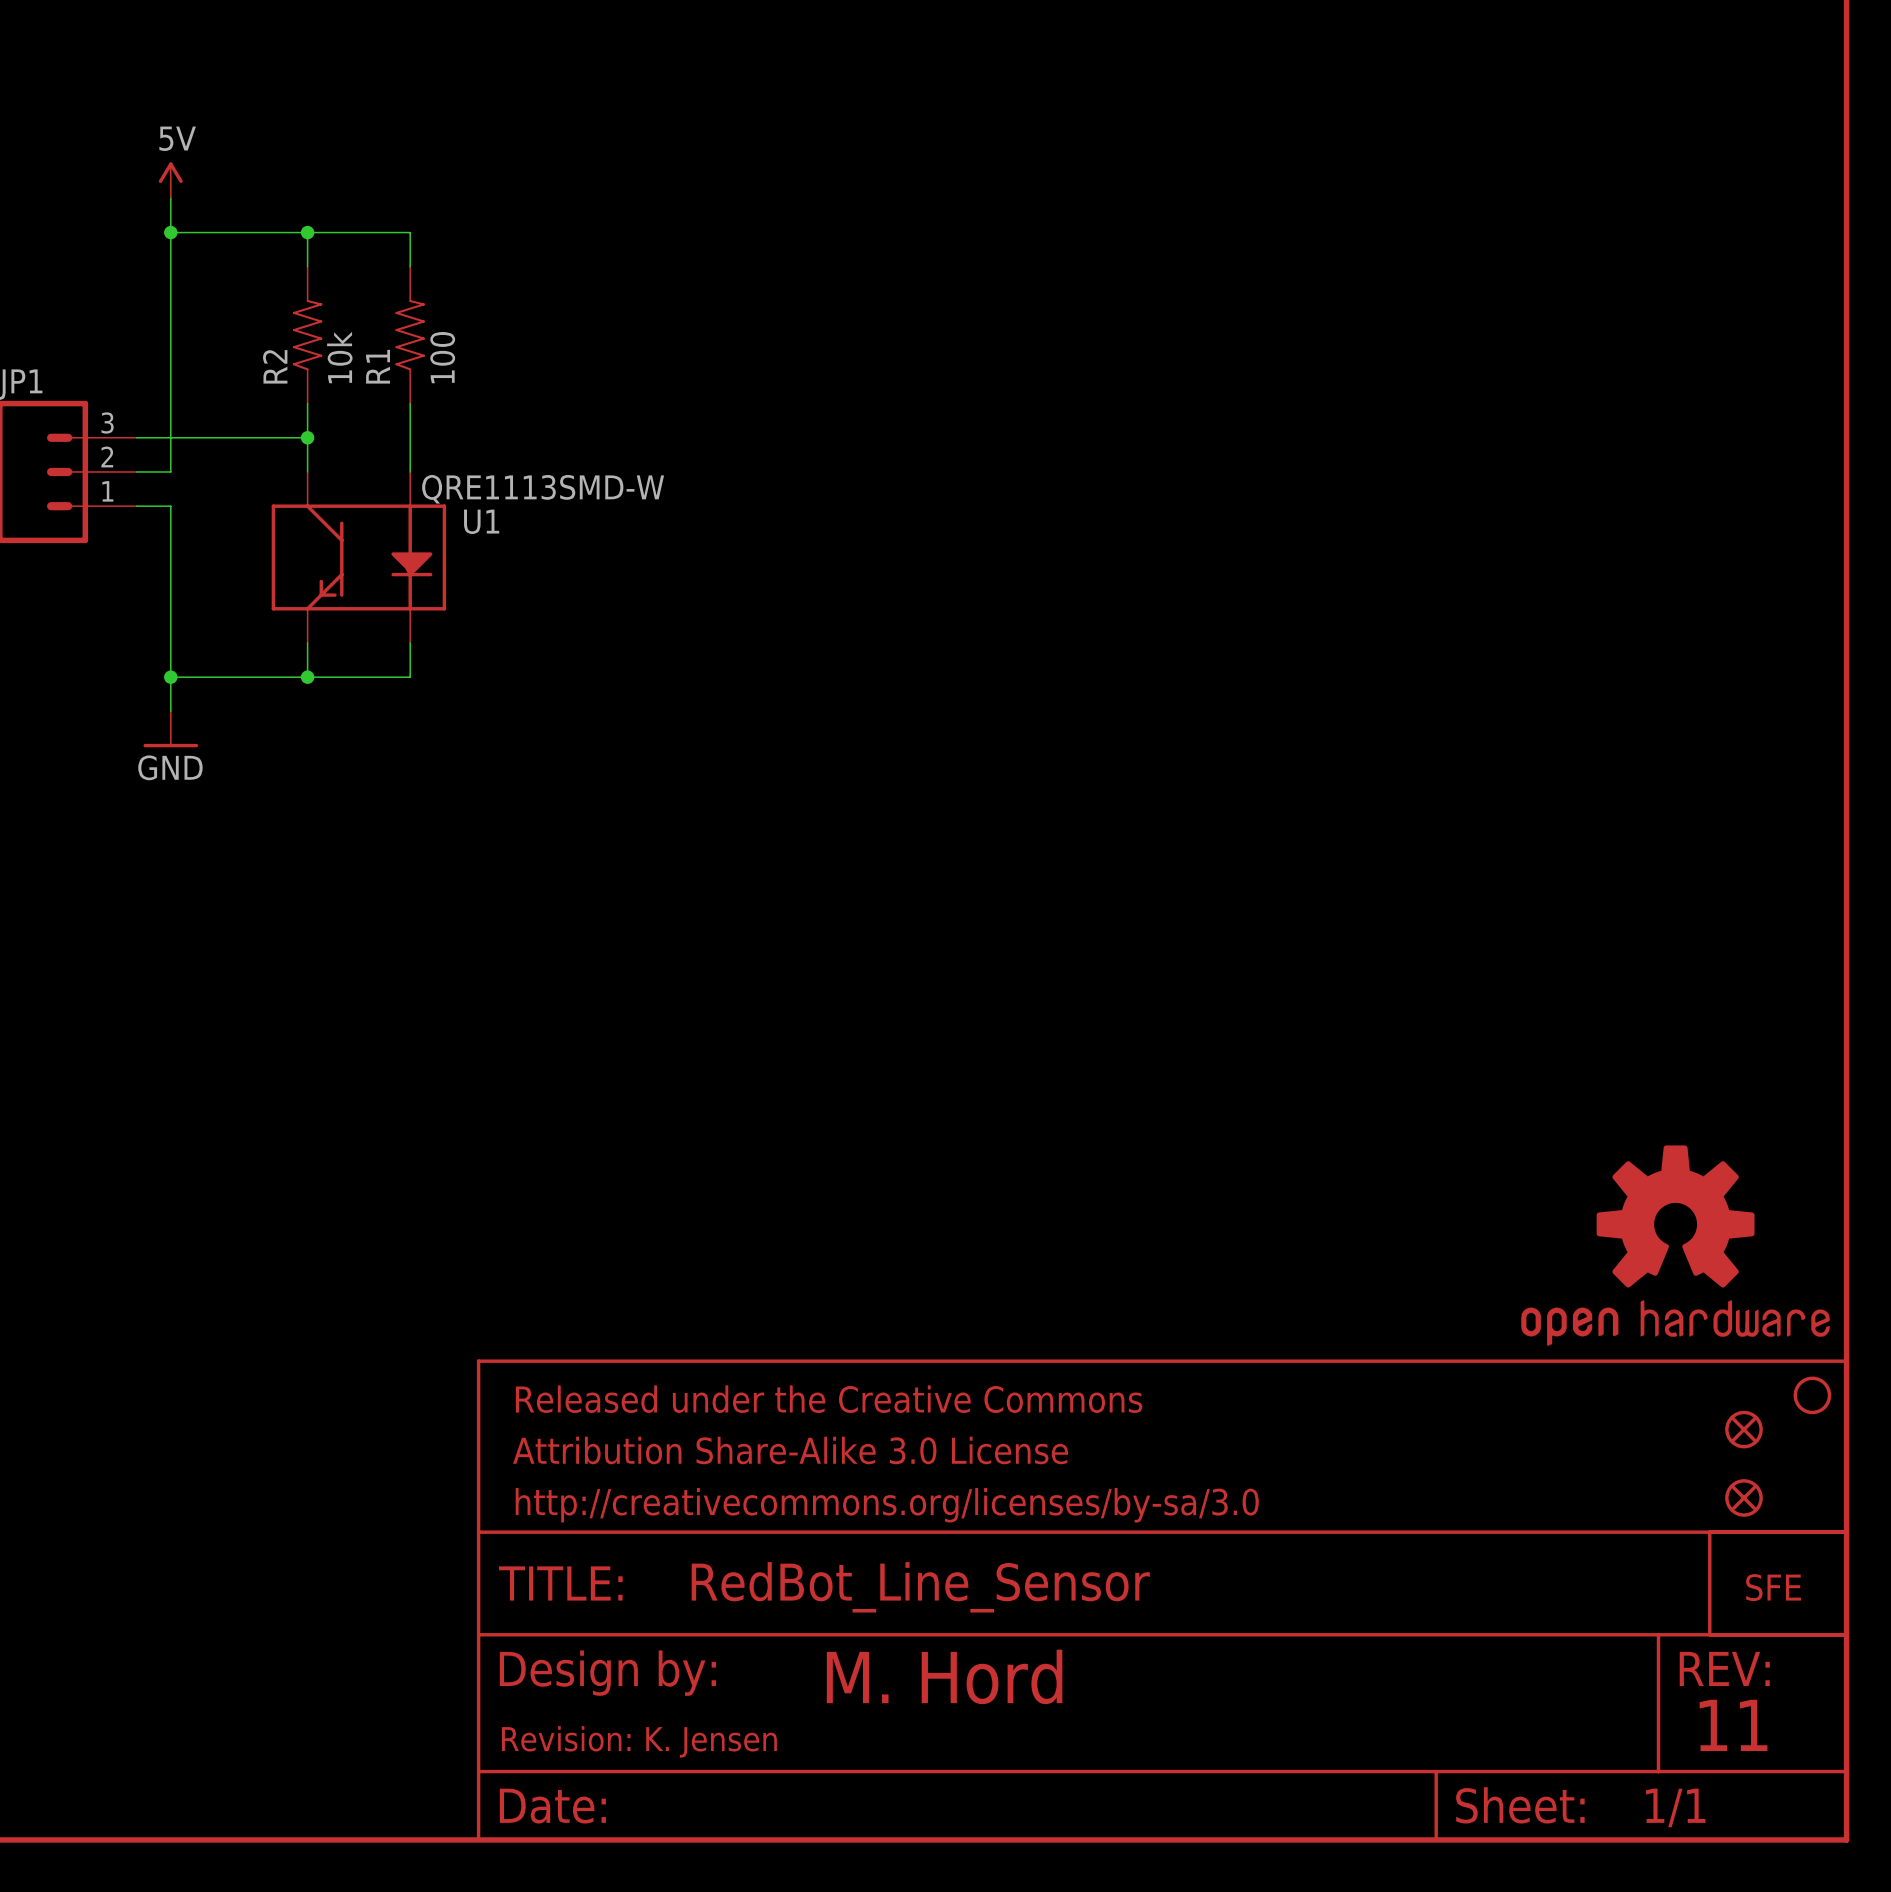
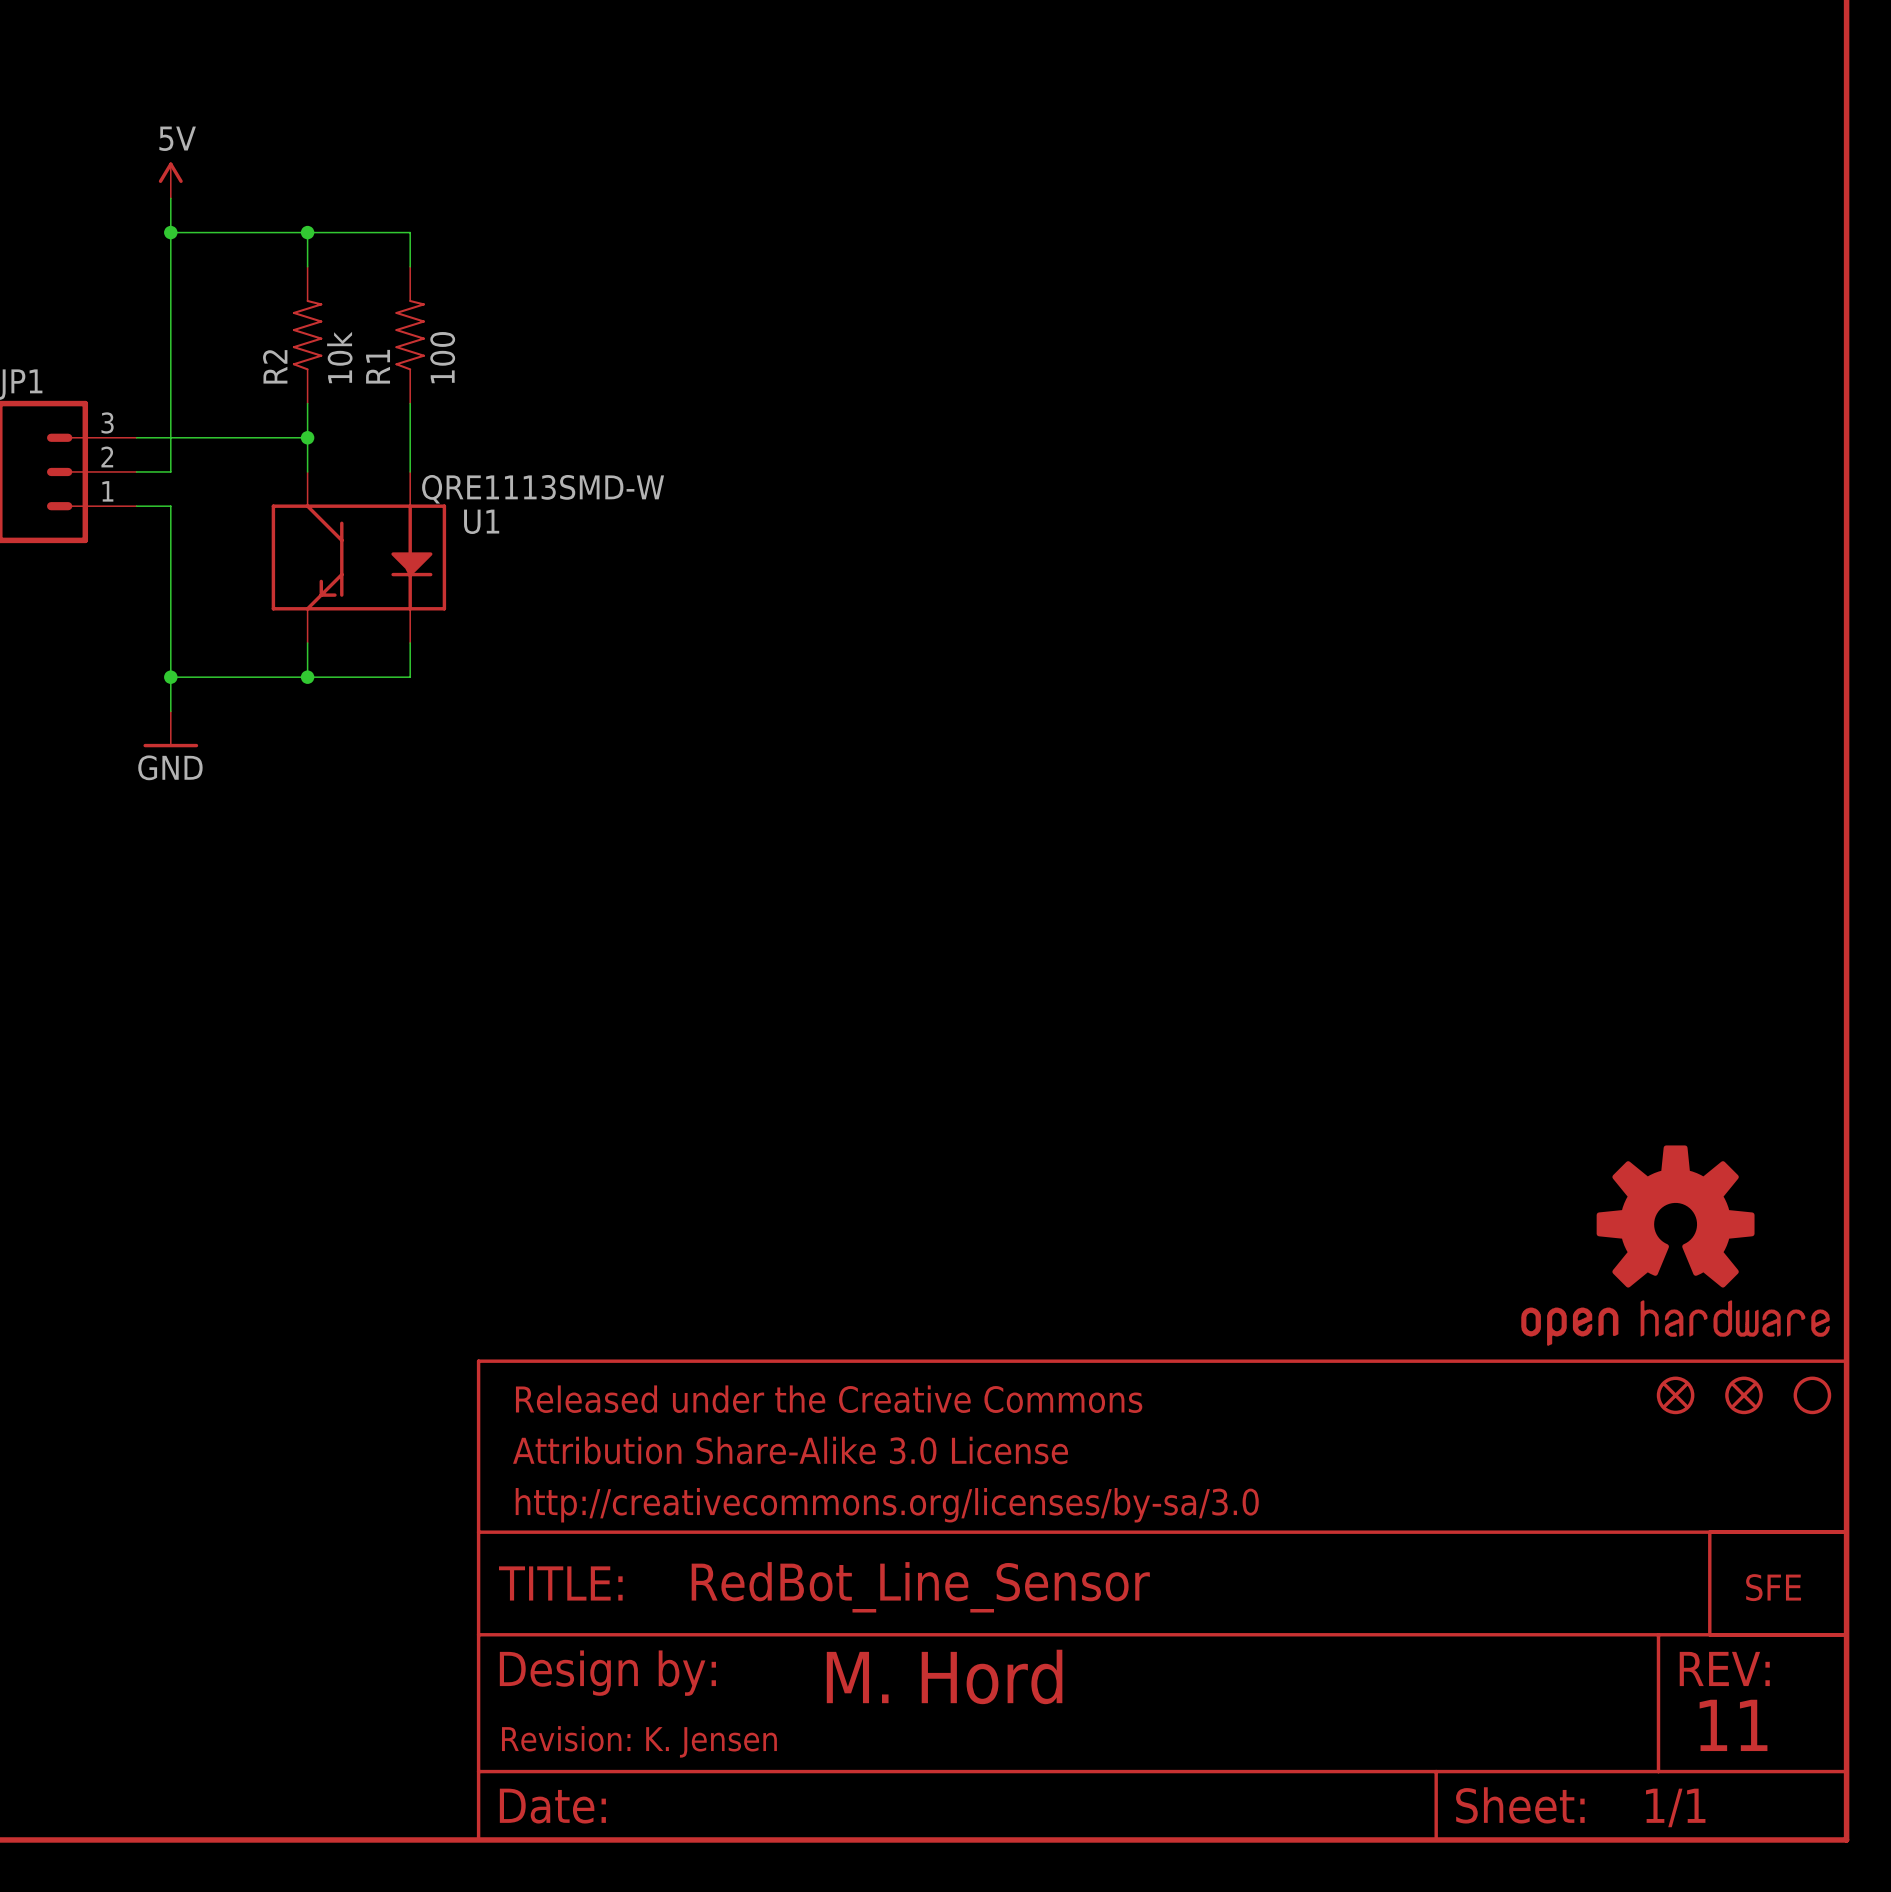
part: none -> (1675, 1395)
part position: (1743, 1429) -> (1743, 1395)
part: (1743, 1497) -> none

